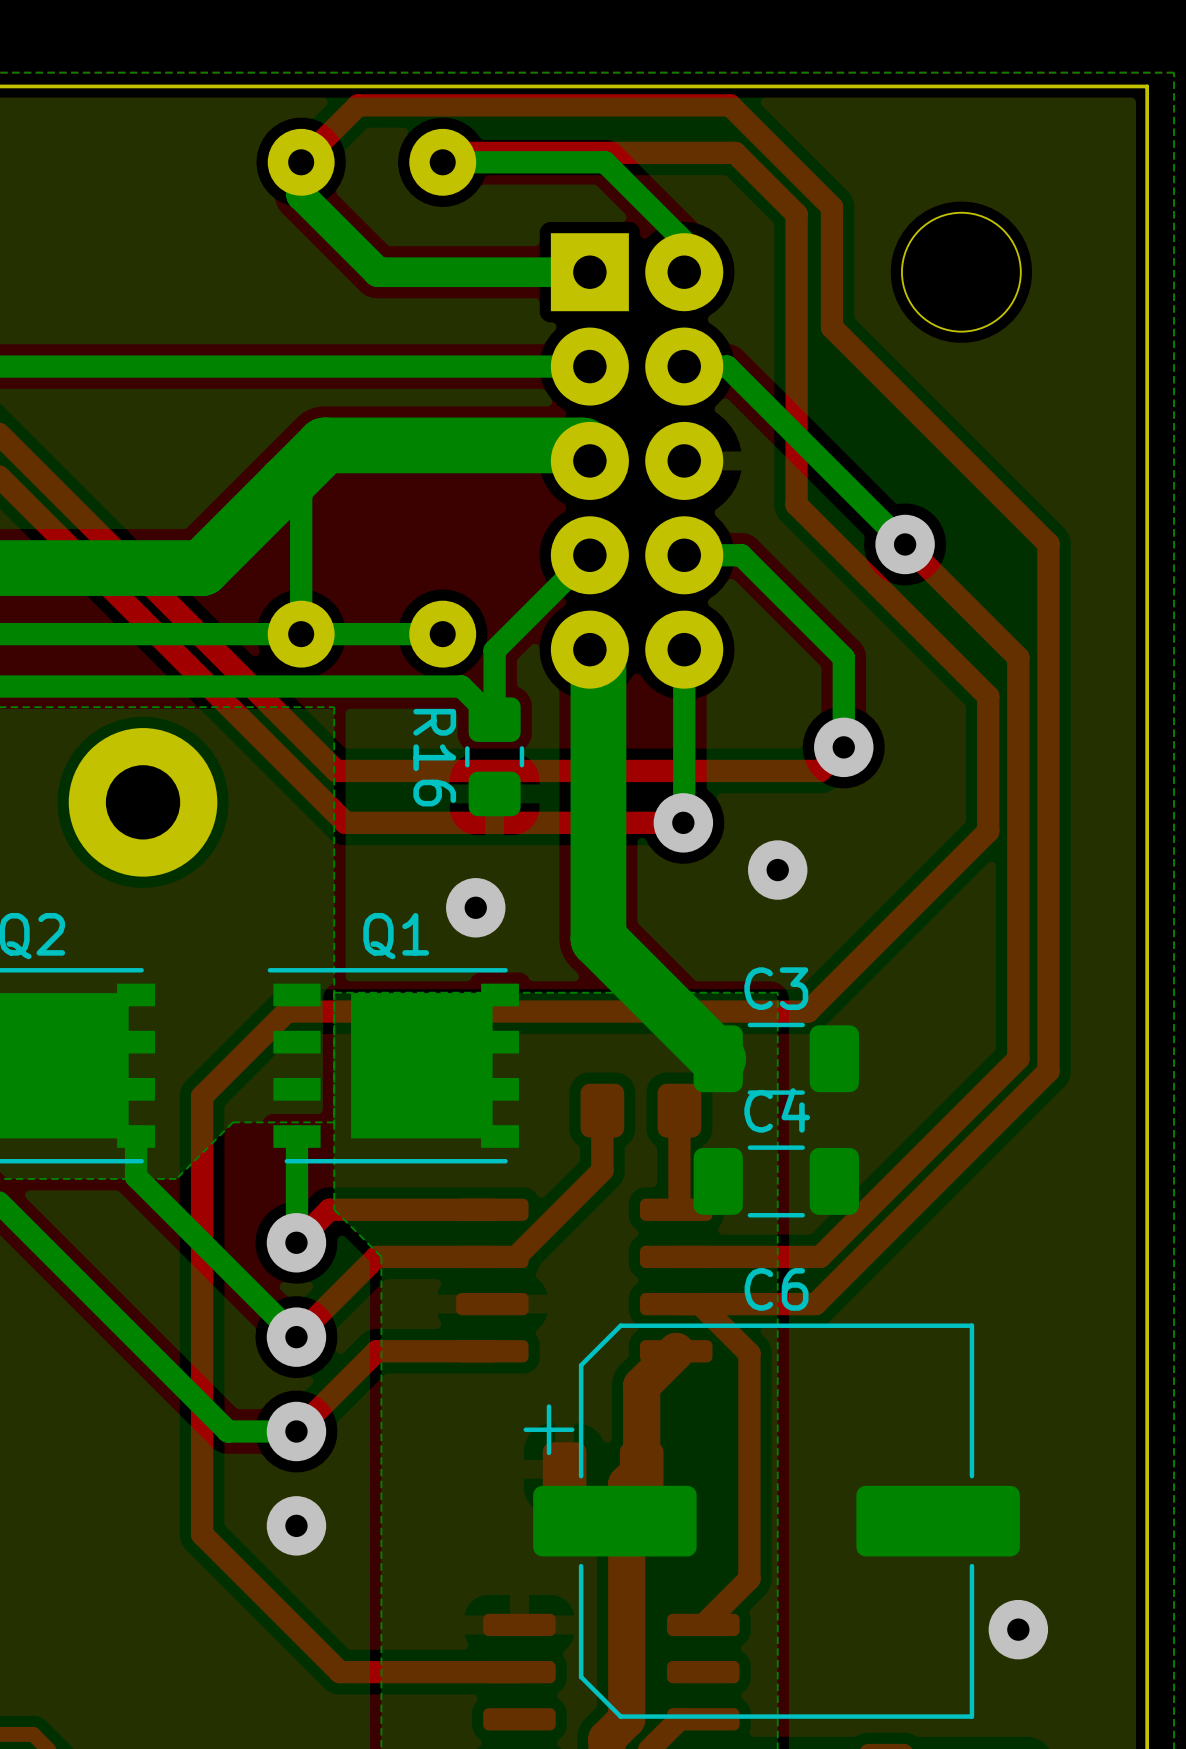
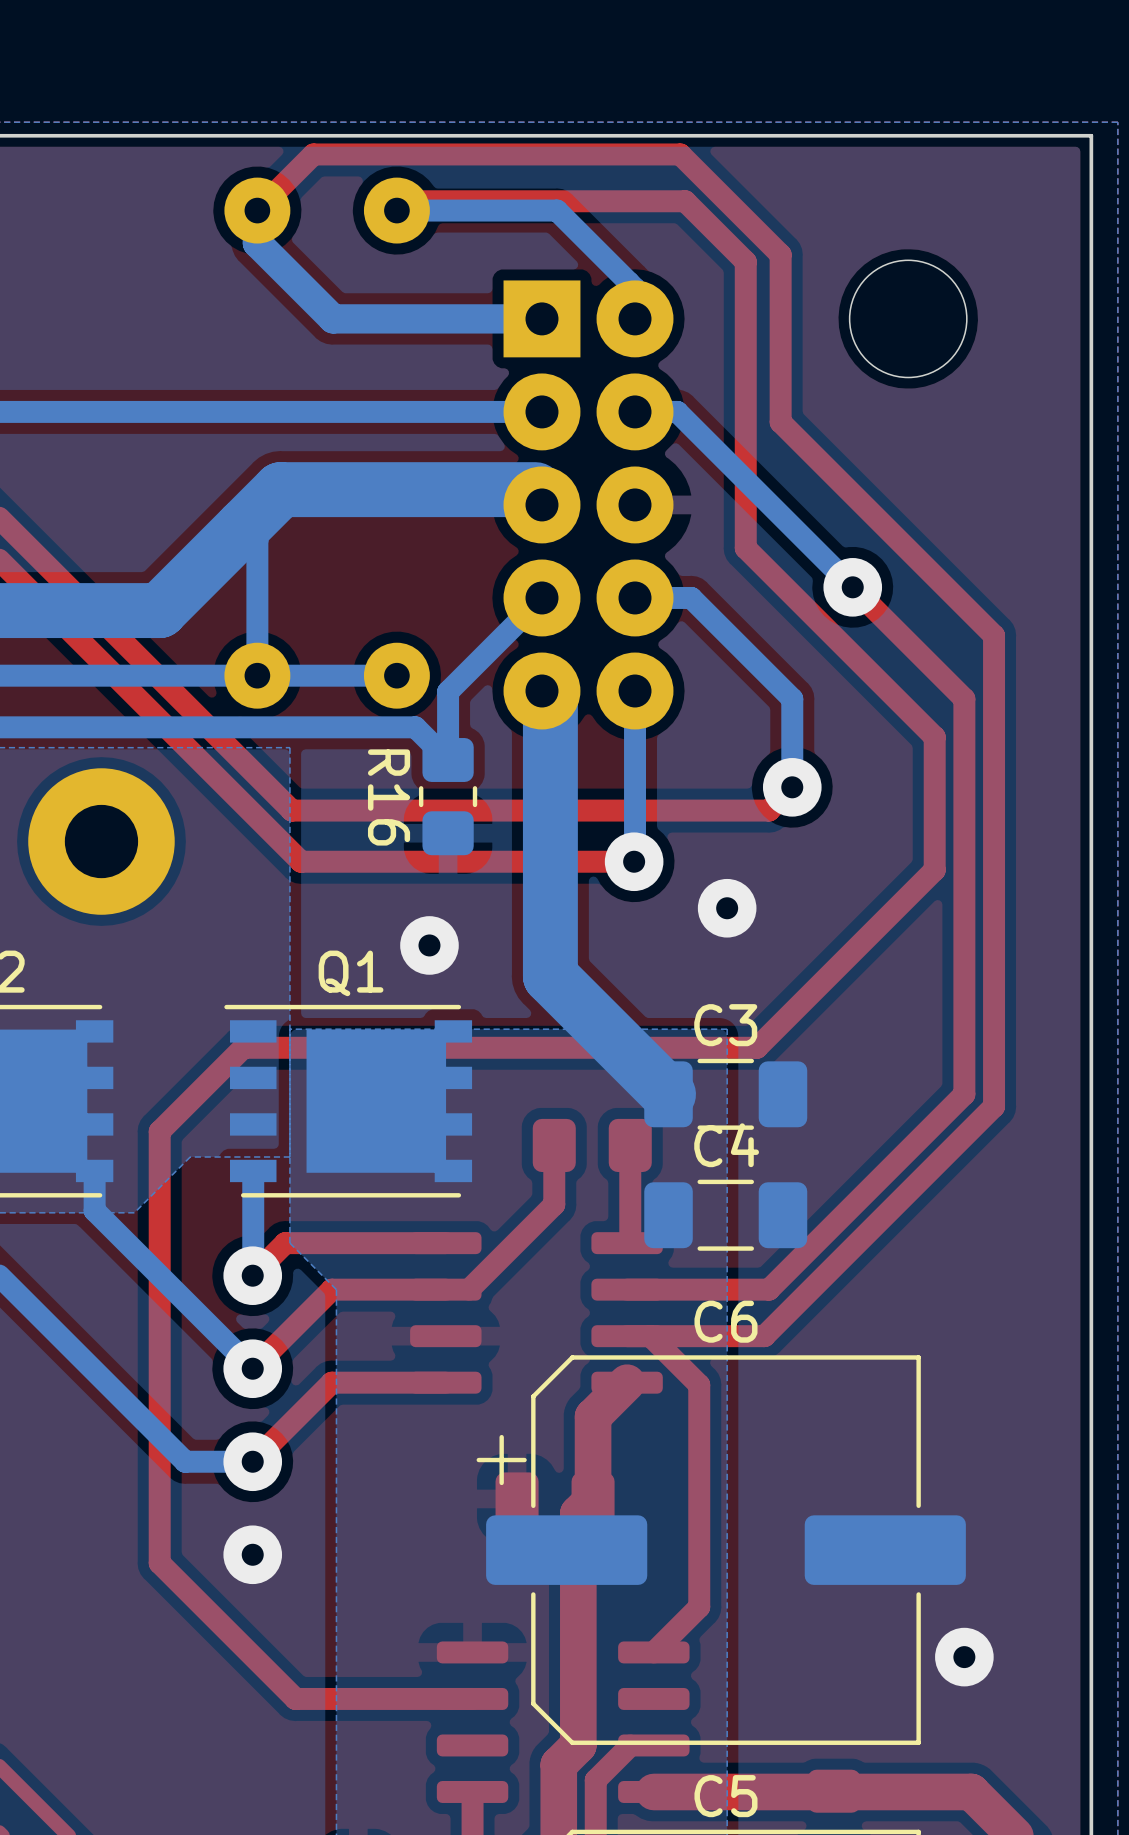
top track: (831, 327) (1048, 543) (1048, 593) -> (780, 373) (780, 422) (994, 635)

